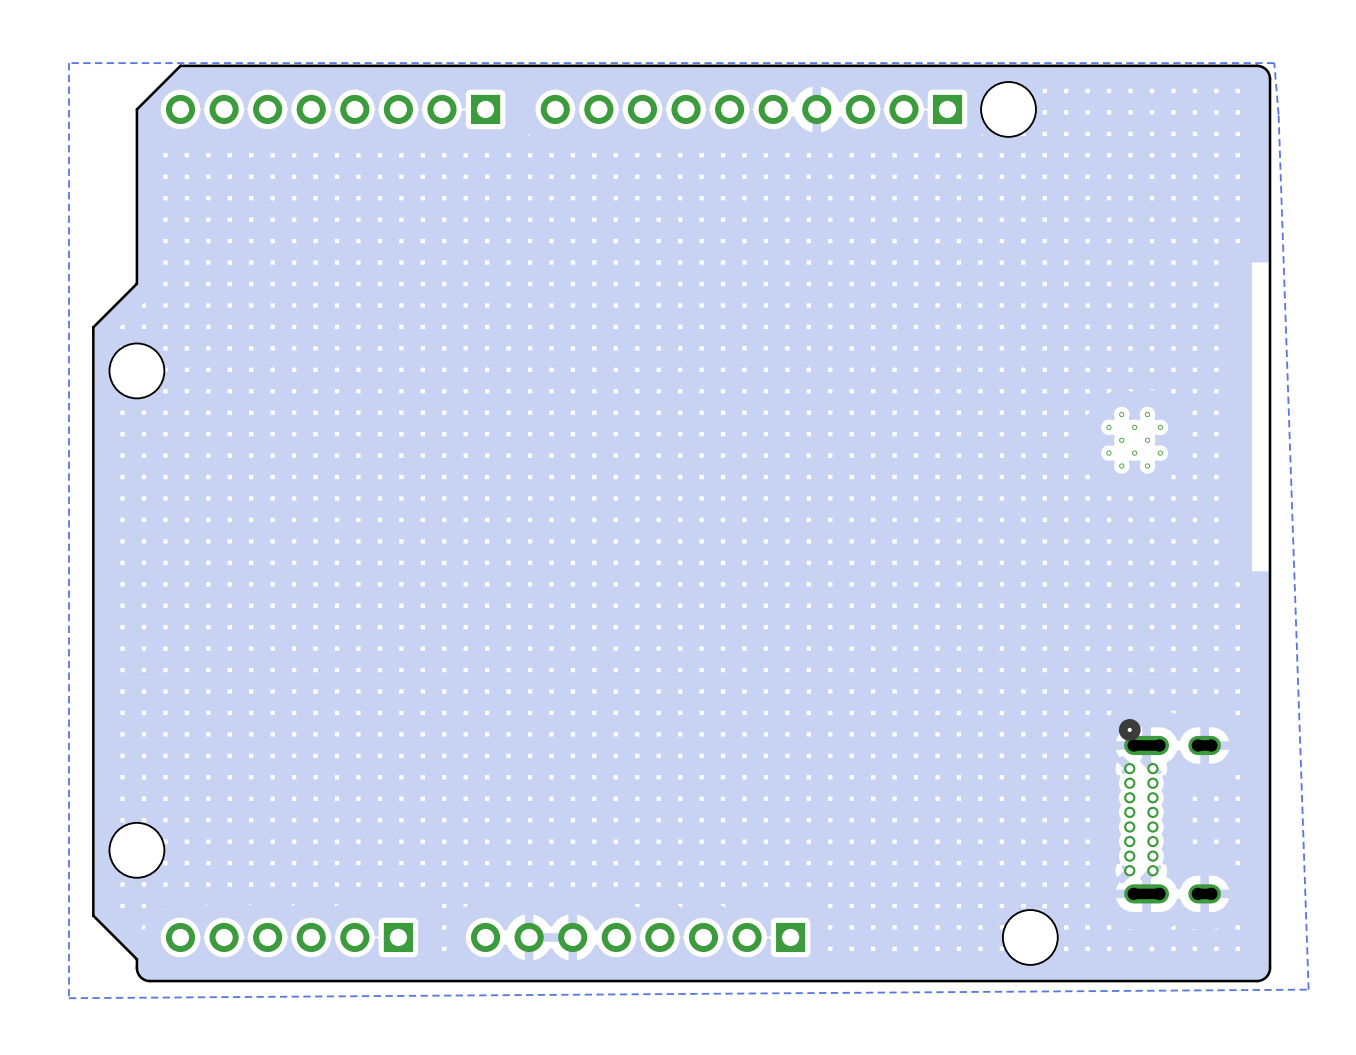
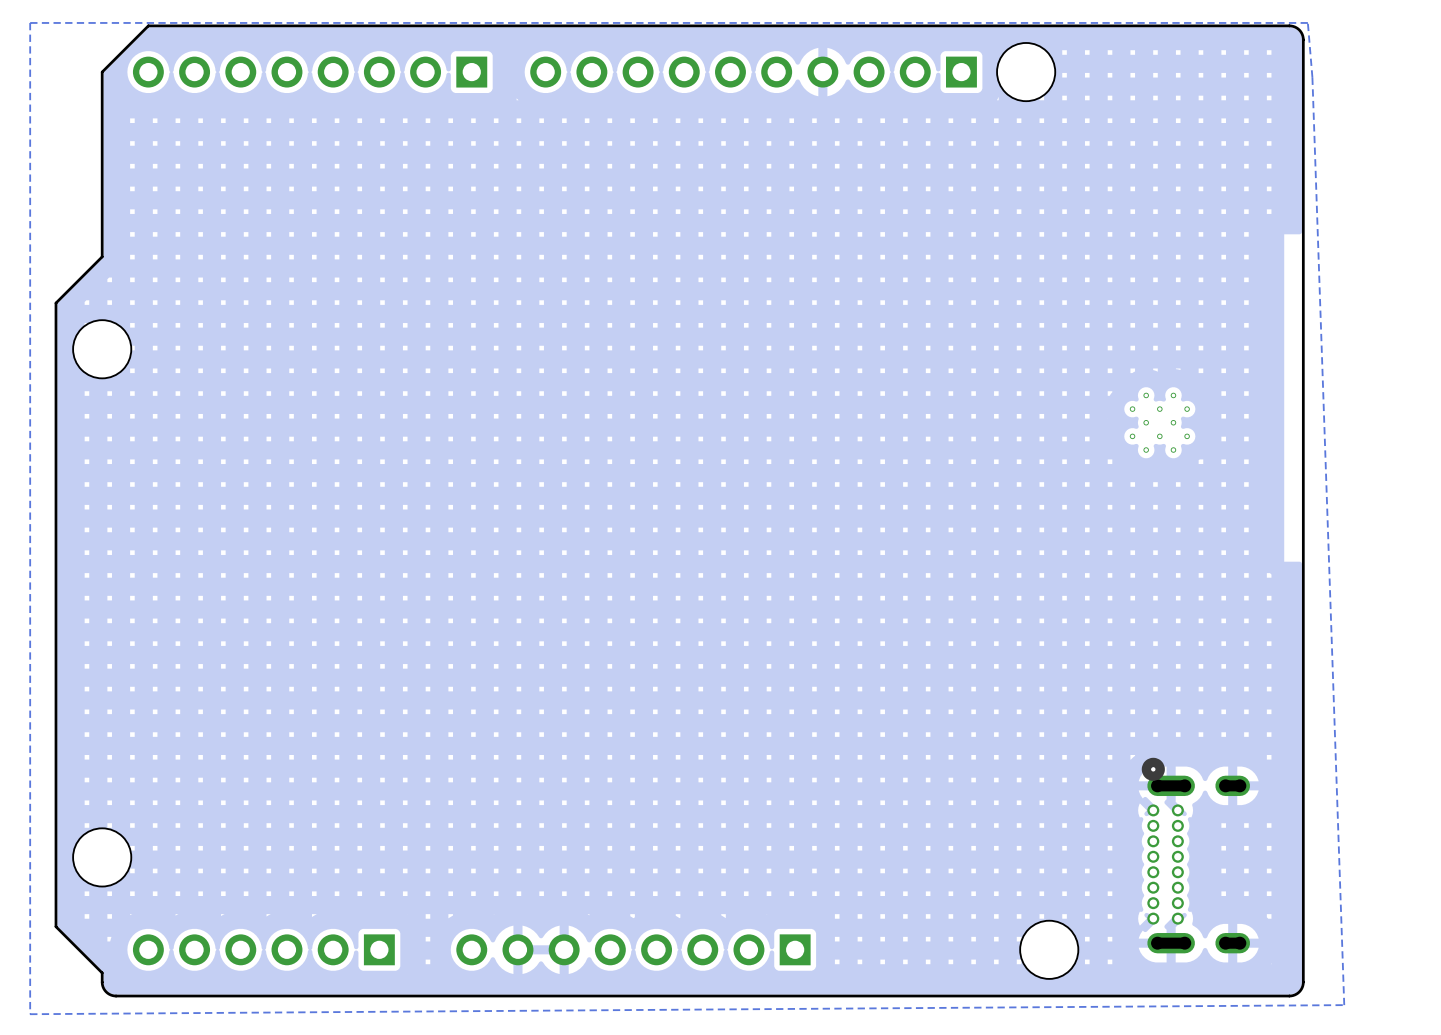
part position: (1169, 811) -> (1195, 855)

